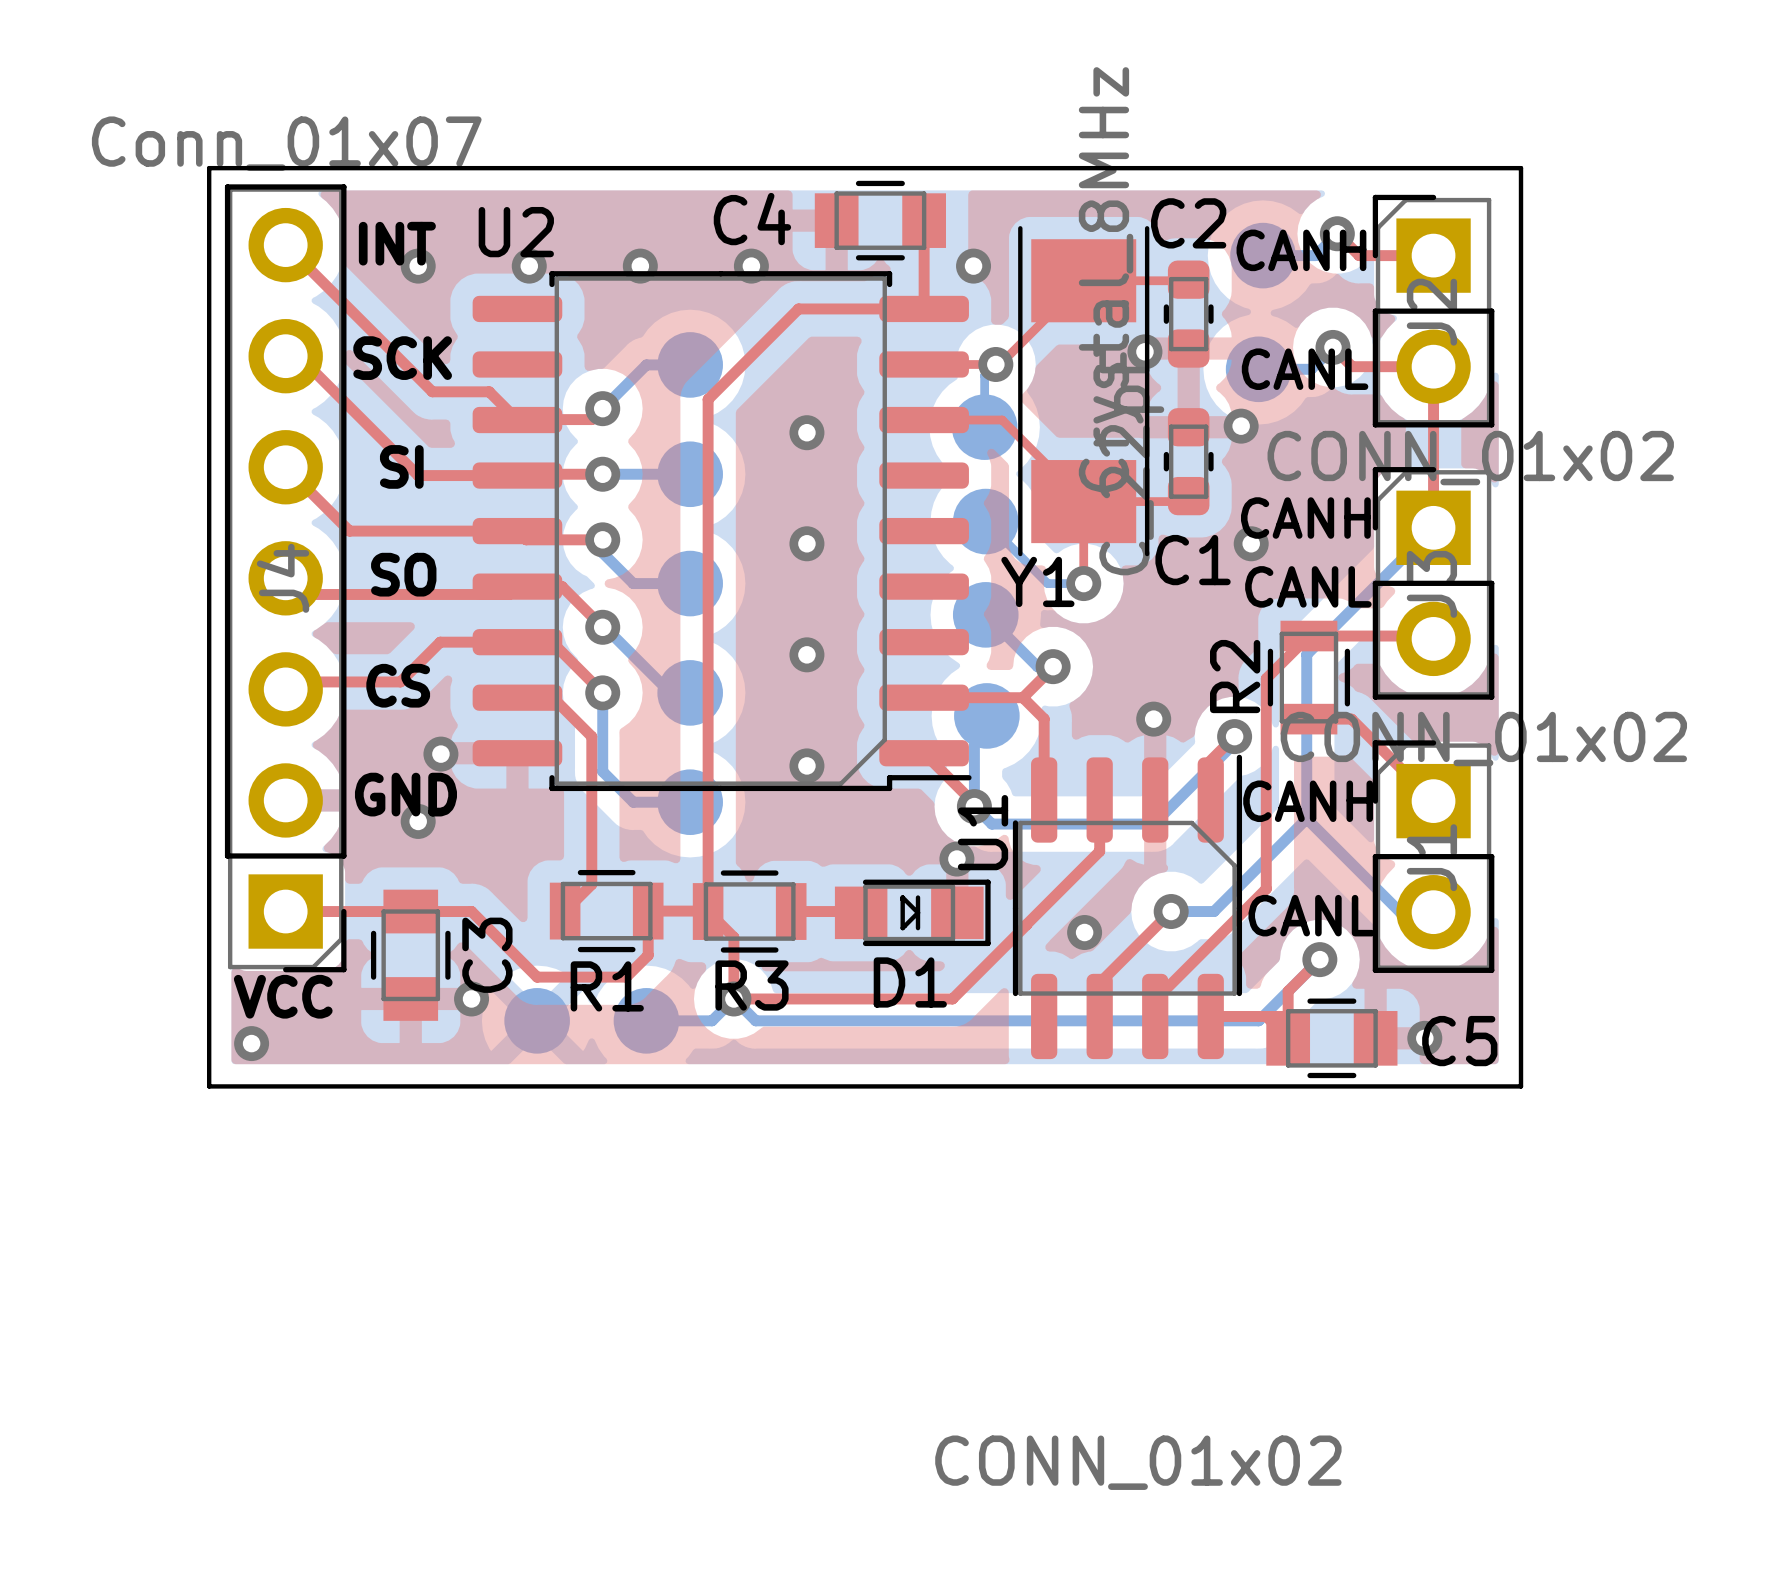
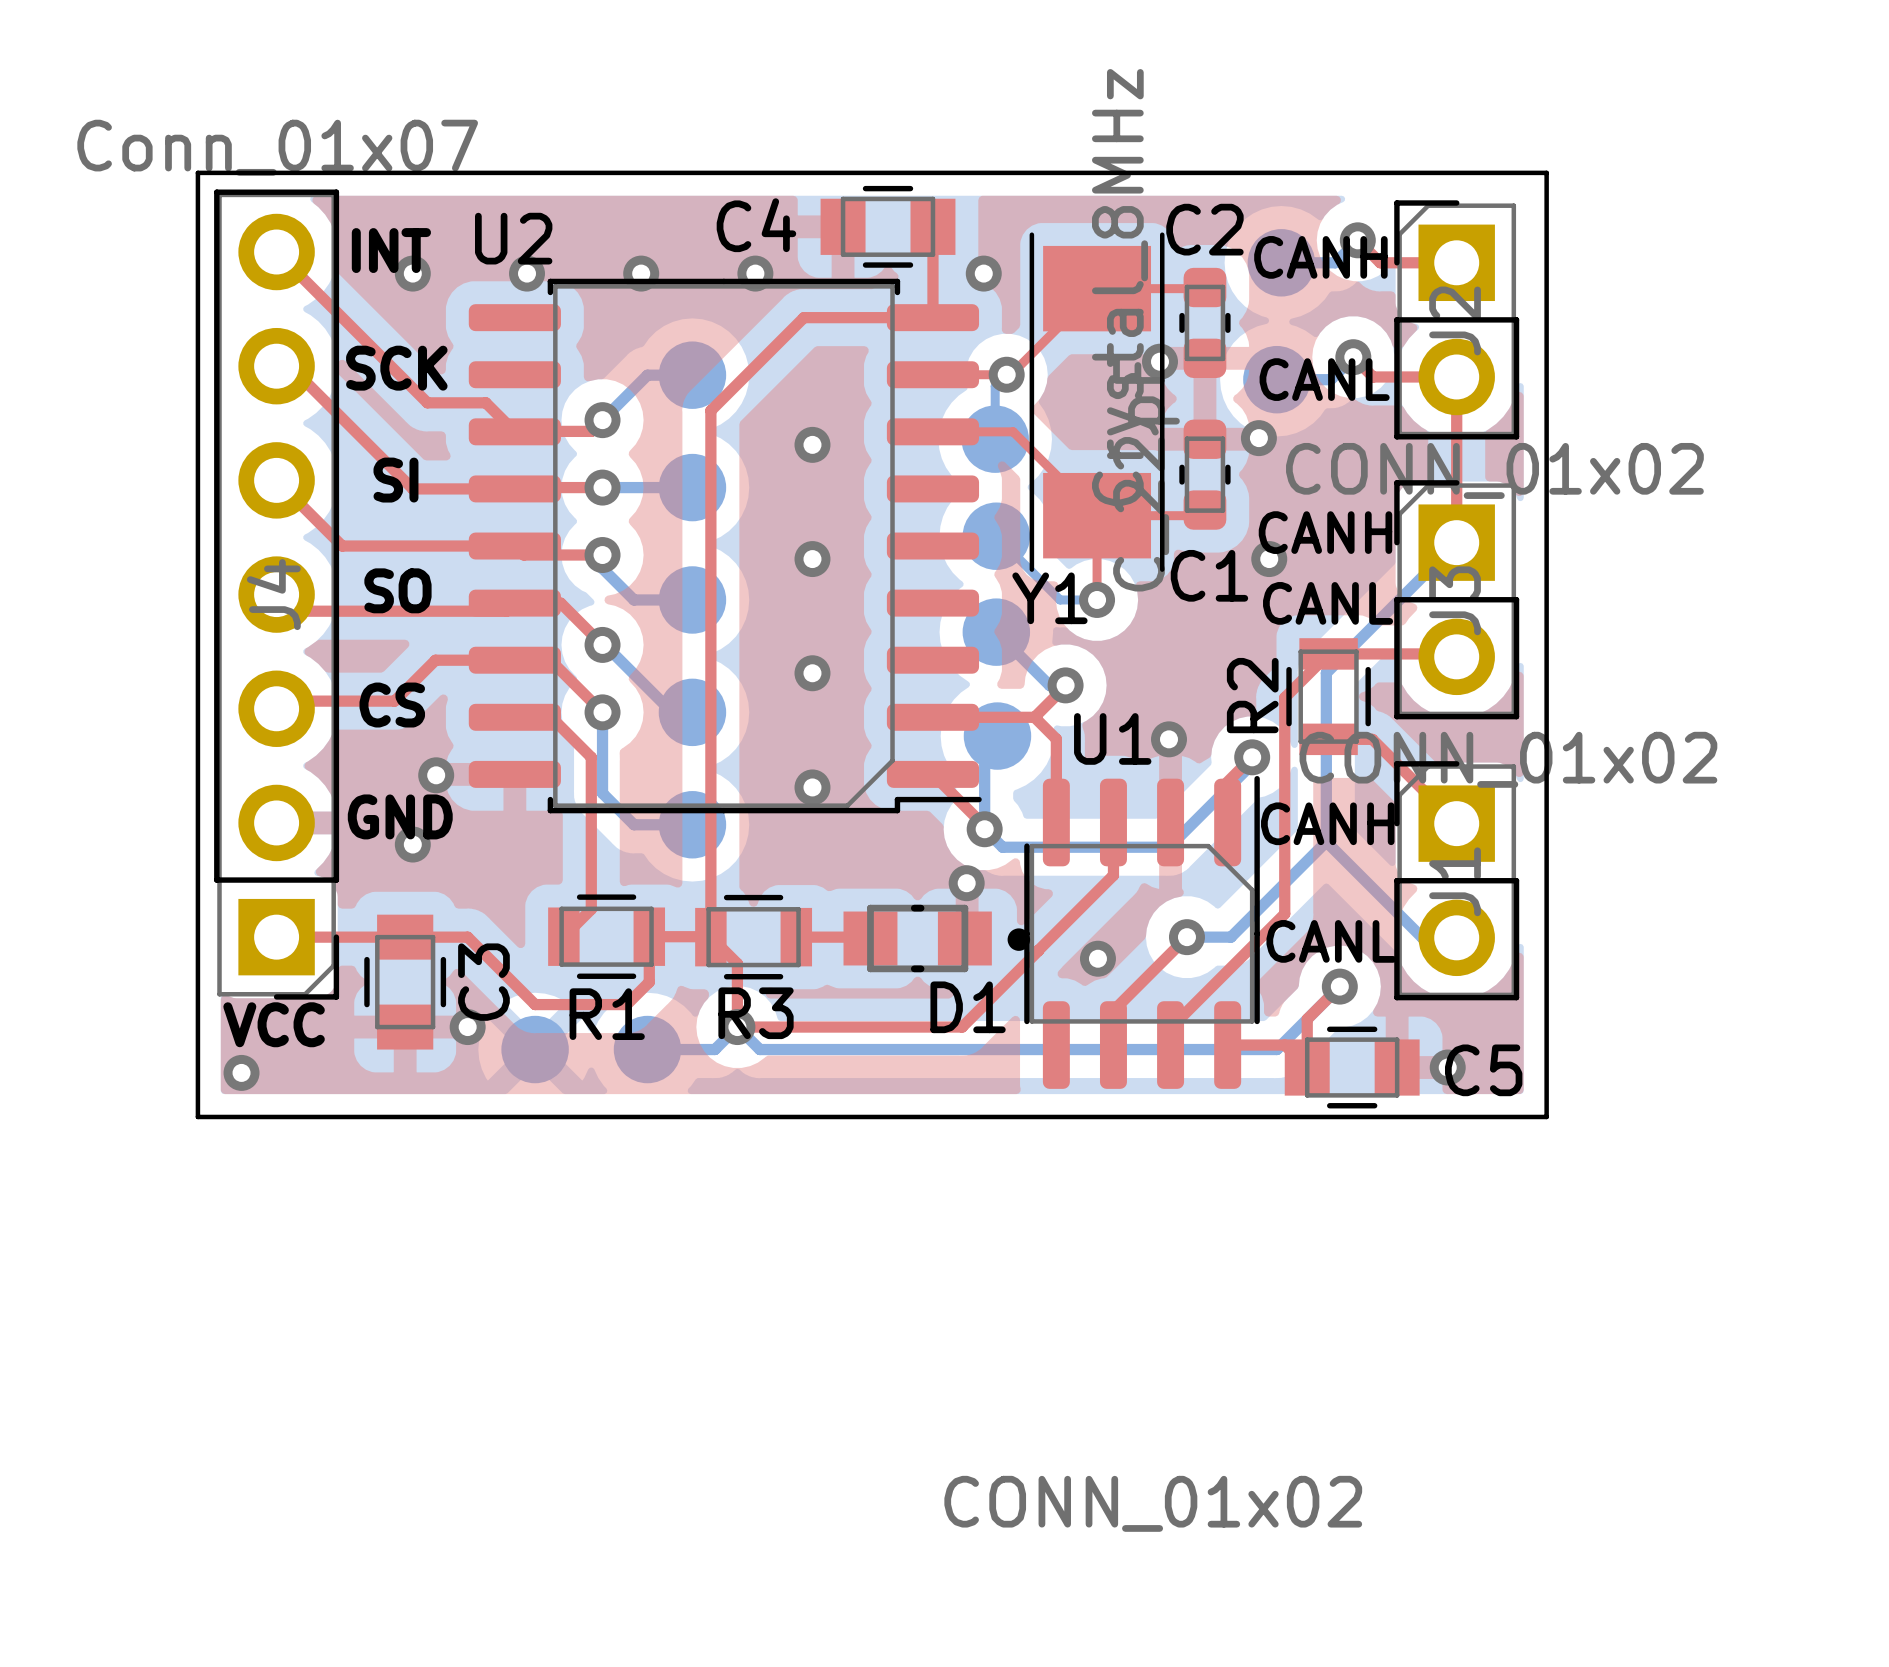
U1 name rotation: 0° (983, 832) -> 90° clockwise (1112, 738)
U1 name position: U1 (983, 832) -> U1 (1112, 738)
D1 footprint: [834, 879, 991, 947] -> [843, 904, 1031, 973]

